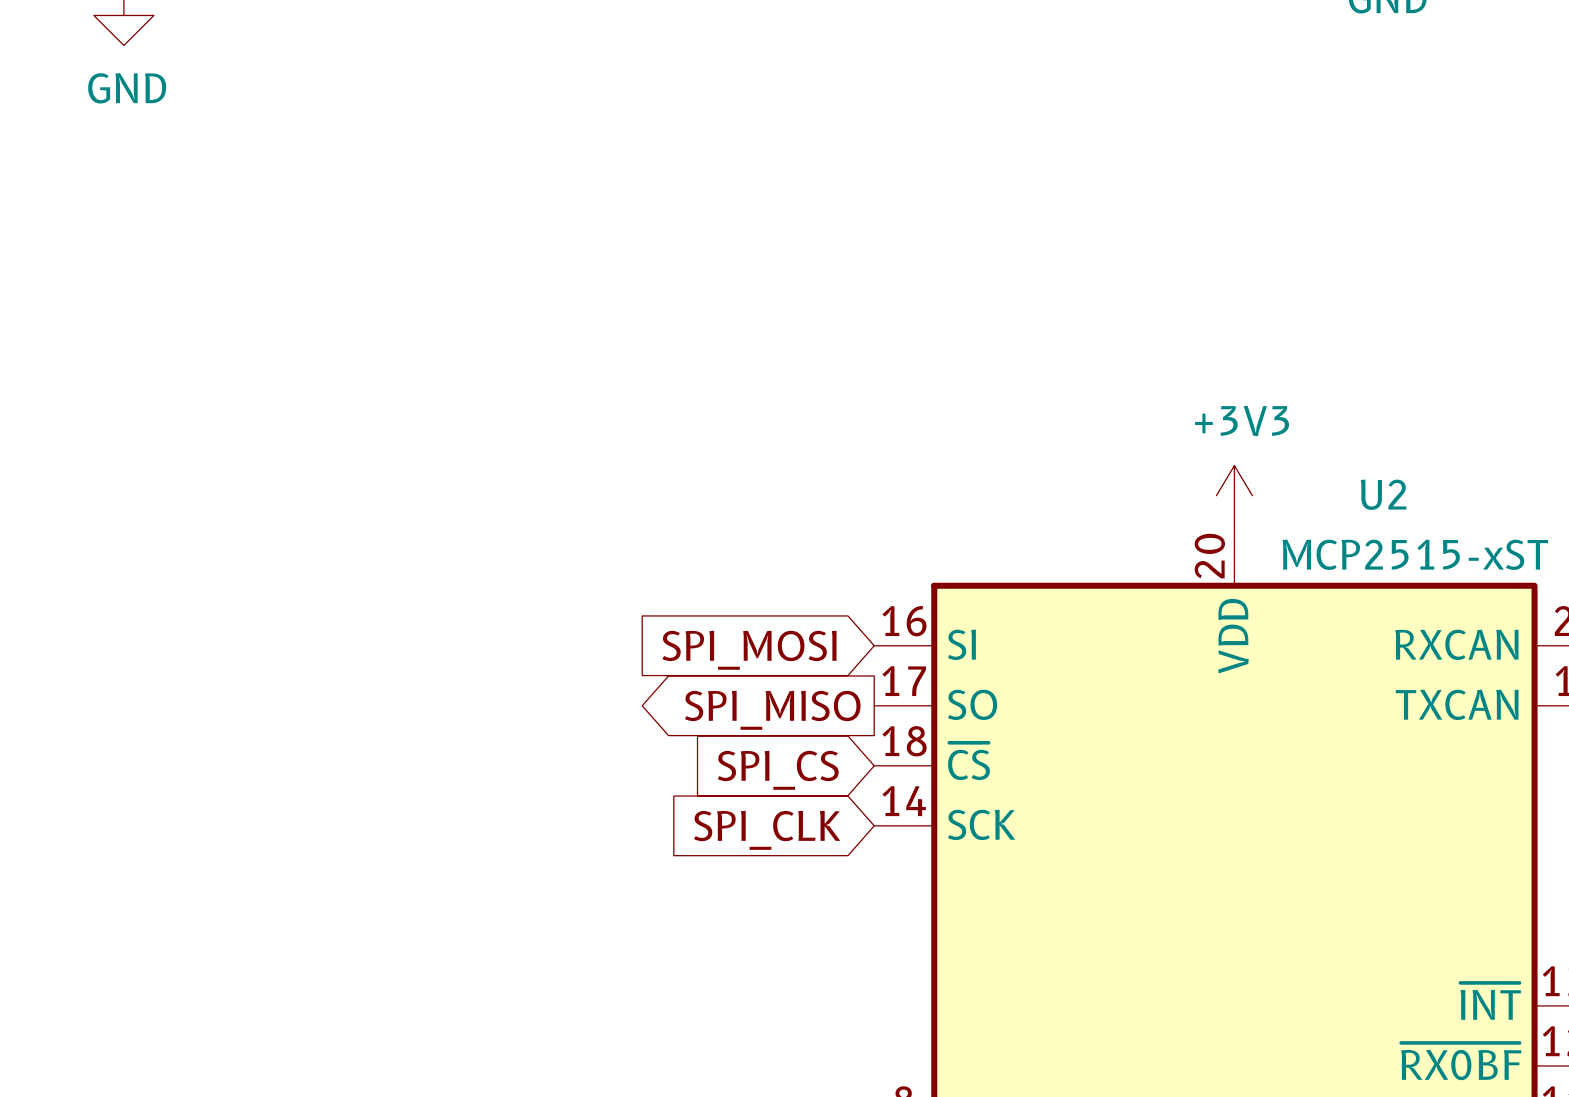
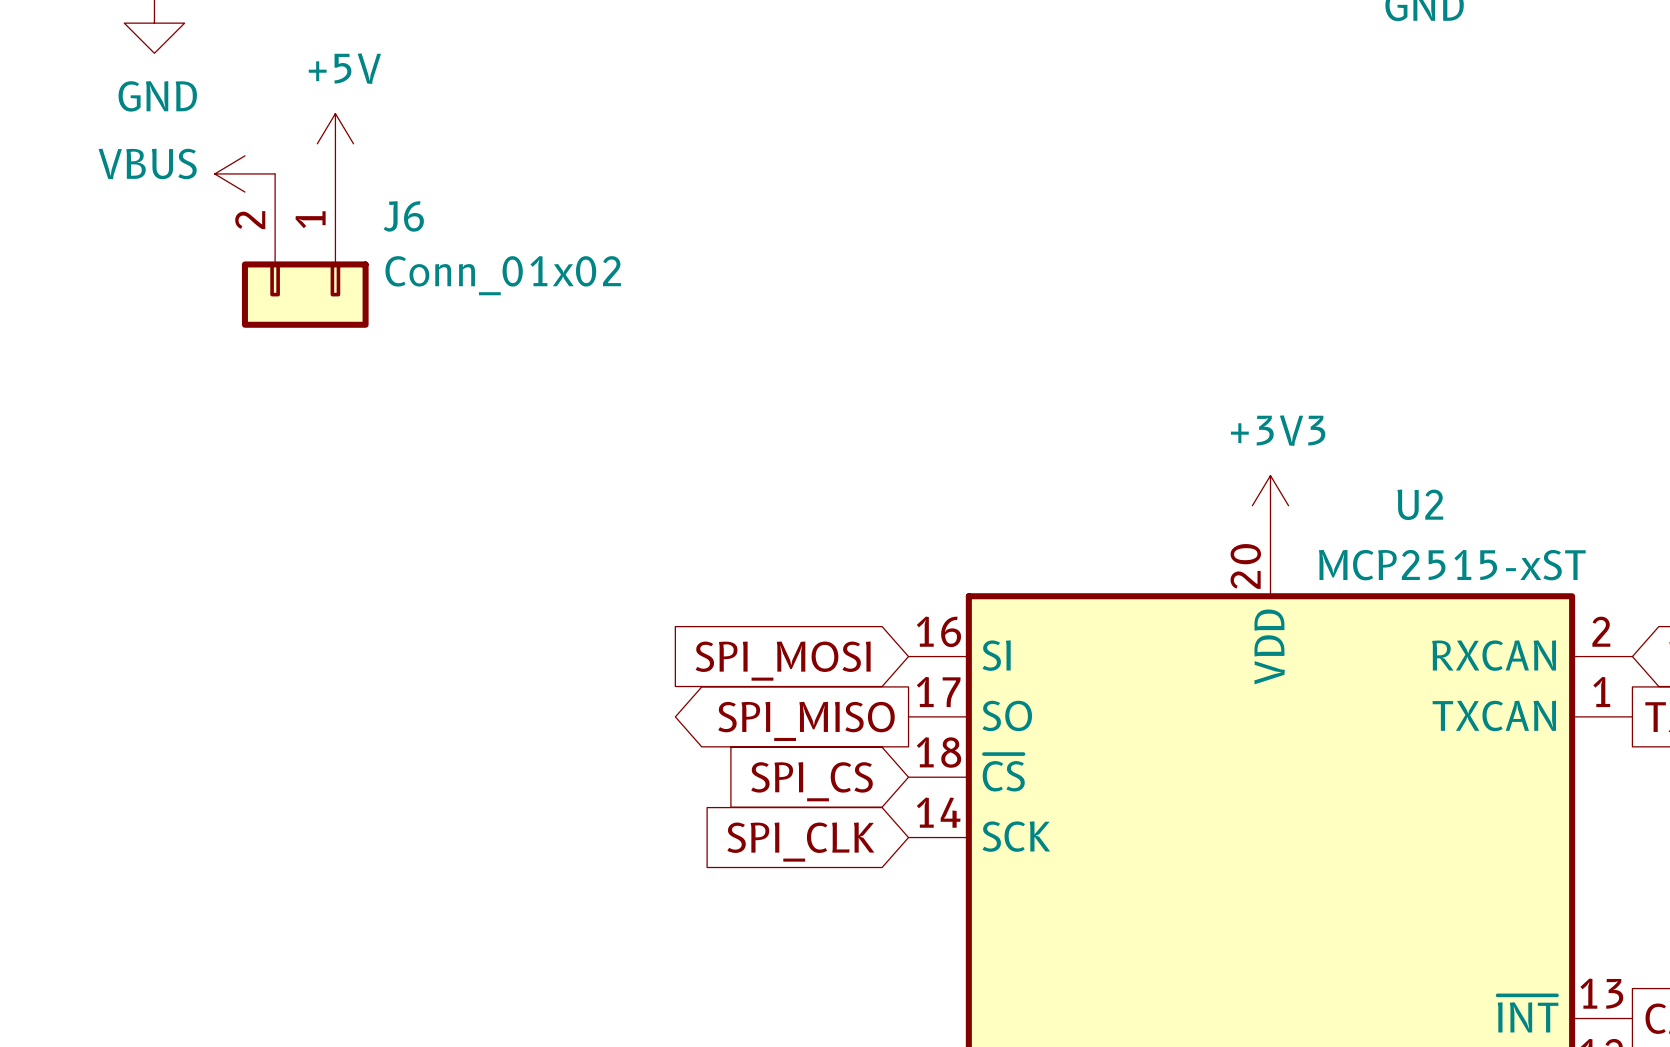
power symbol: none -> +5V (335, 143)
power symbol: none -> VBUS (244, 173)
J6: none -> Conn_01x02 (305, 250)

